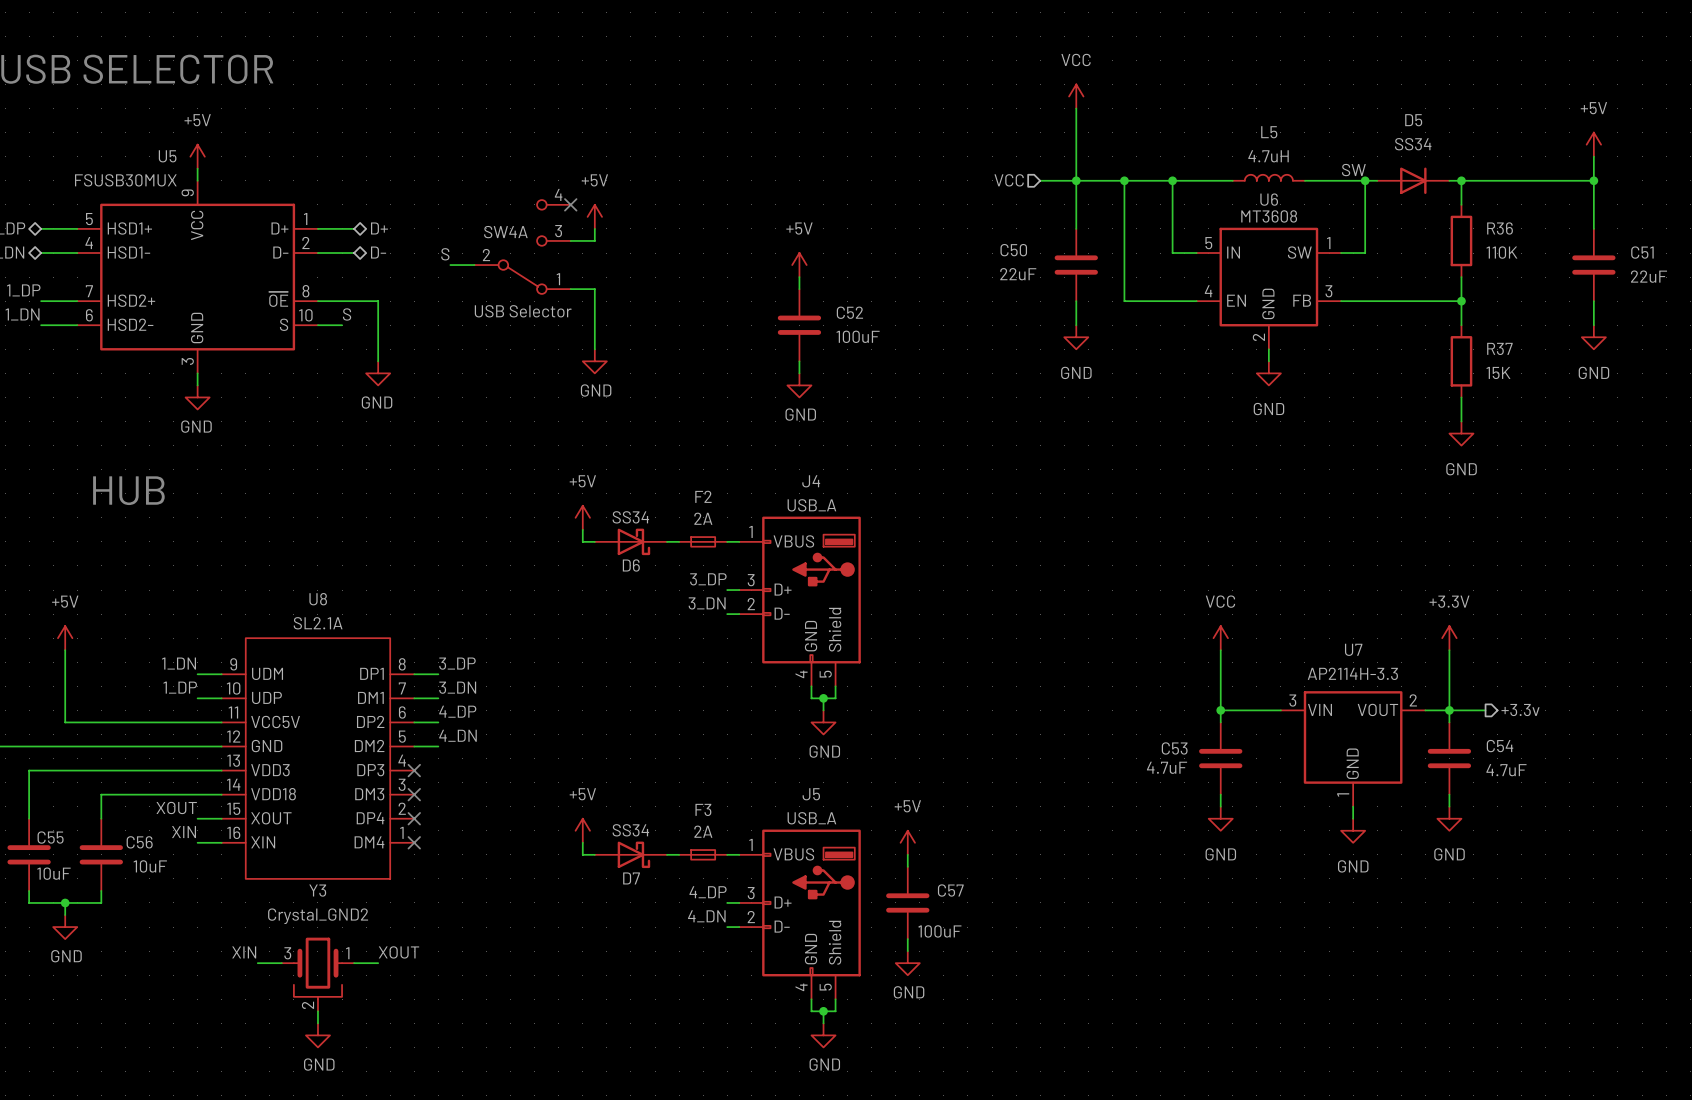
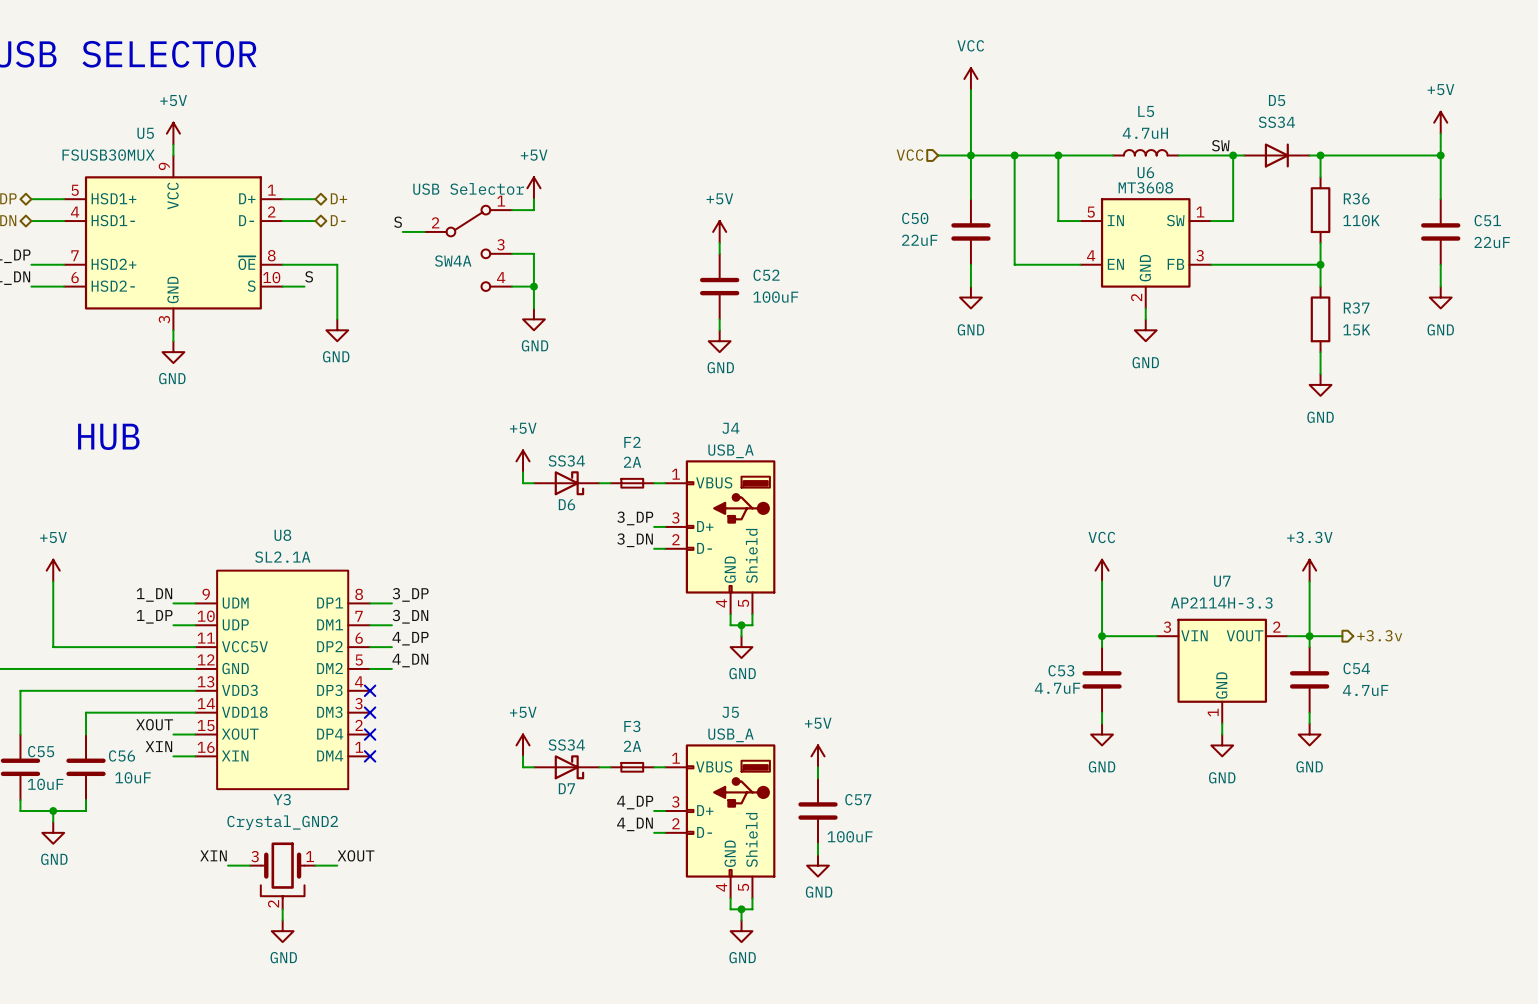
no-connect mark: (570, 204) -> none
SW4A flip: as is (522, 246) -> up-down (468, 248)
wire: none -> (512, 286) (533, 286)
junction: none -> (533, 286)

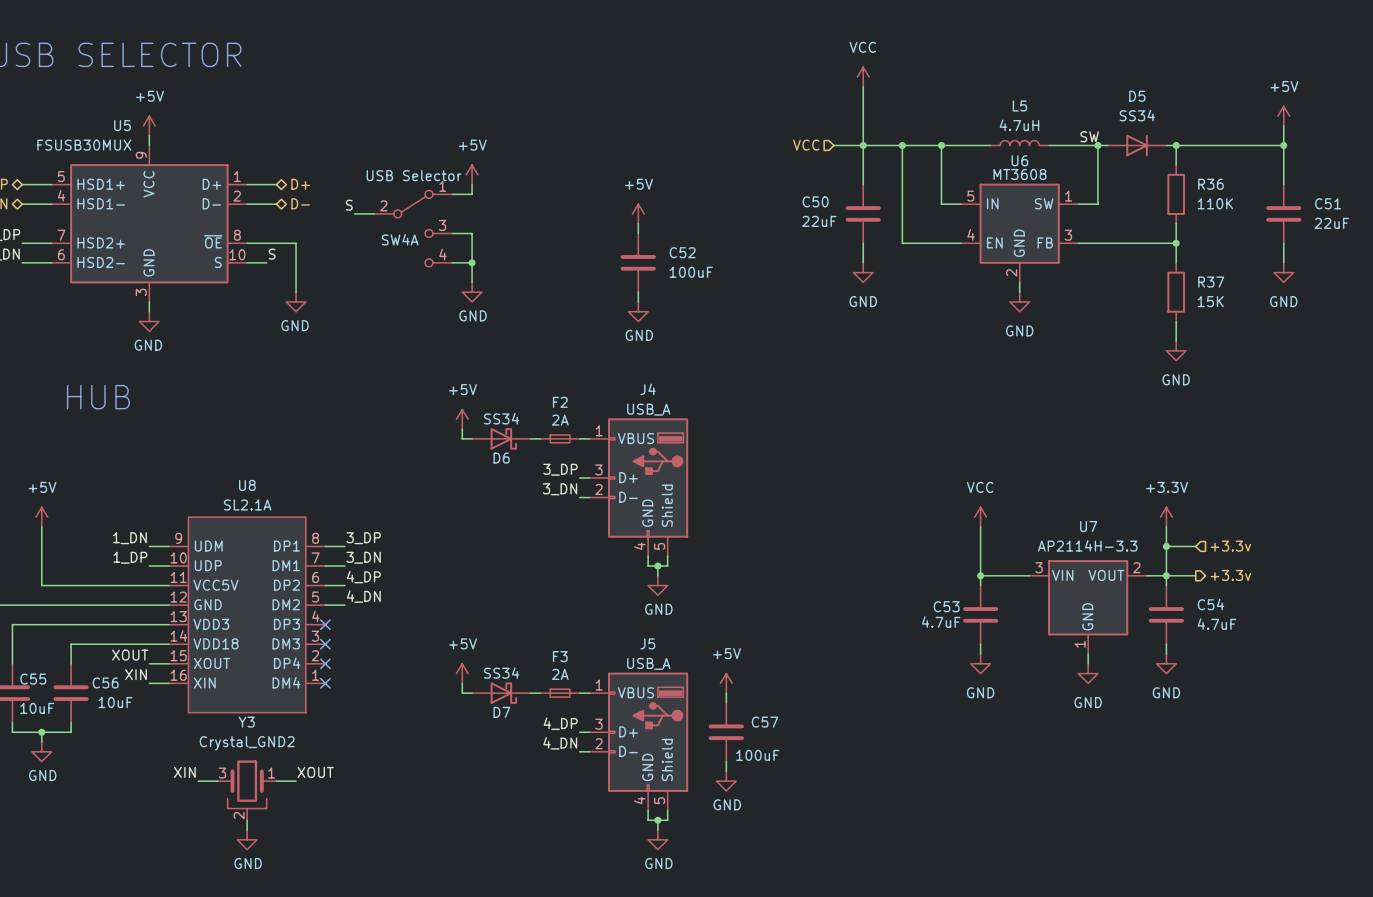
wire: none -> (1166, 546) (1195, 546)
junction: none -> (1166, 546)
hierarchical label: none -> +3.3v (1230, 546)

